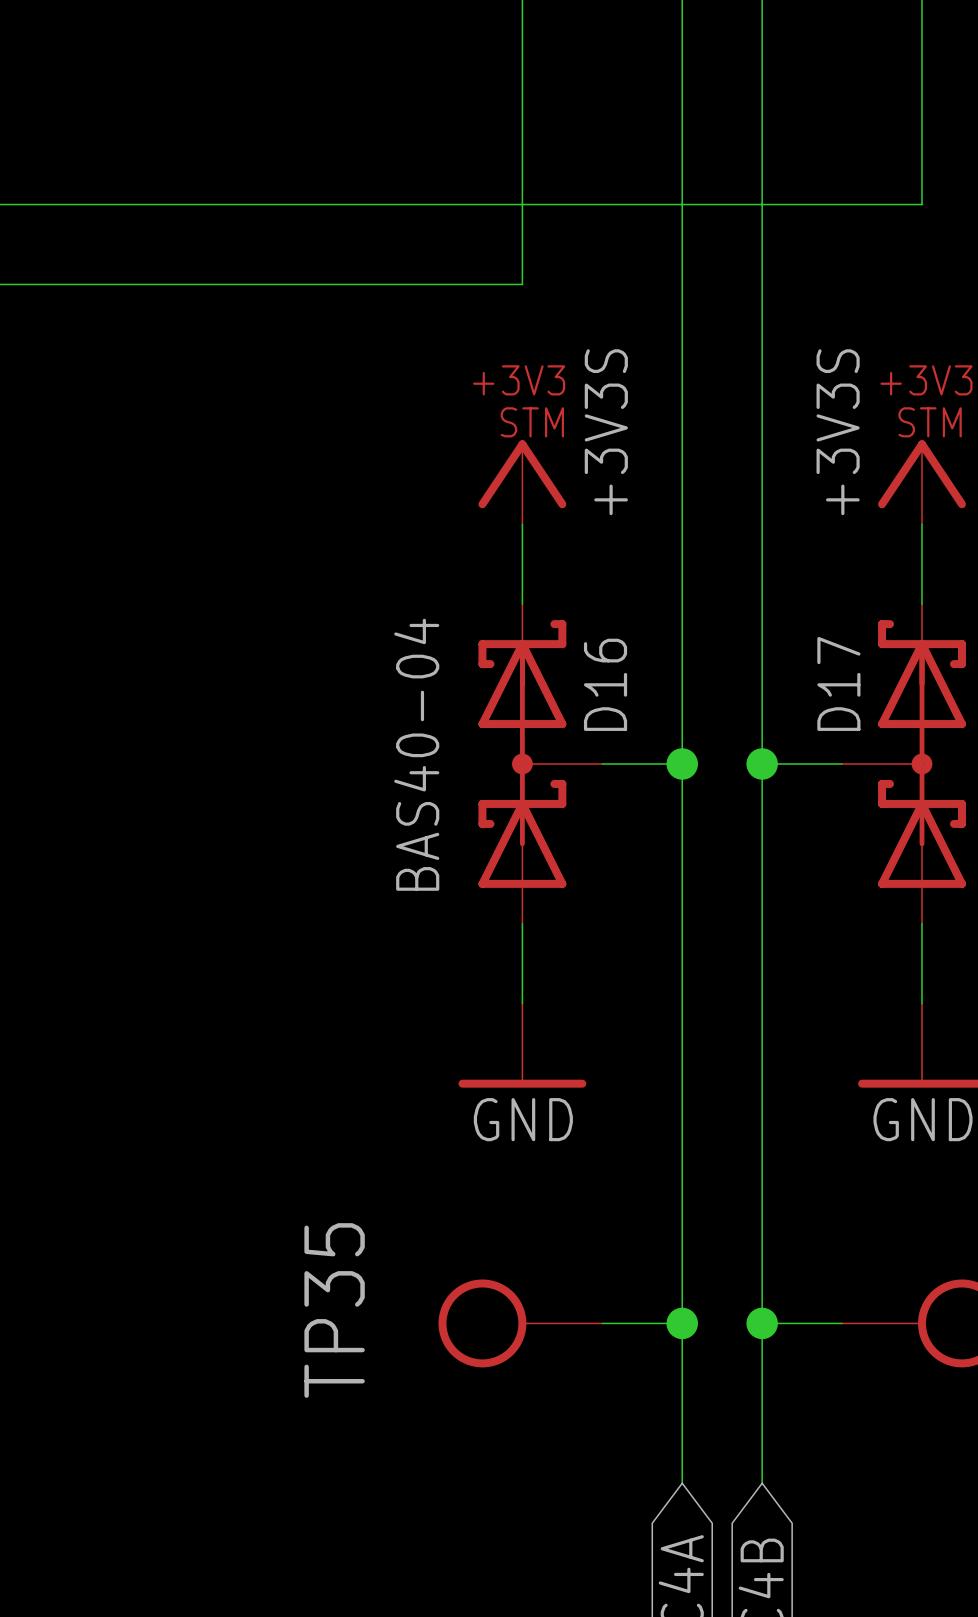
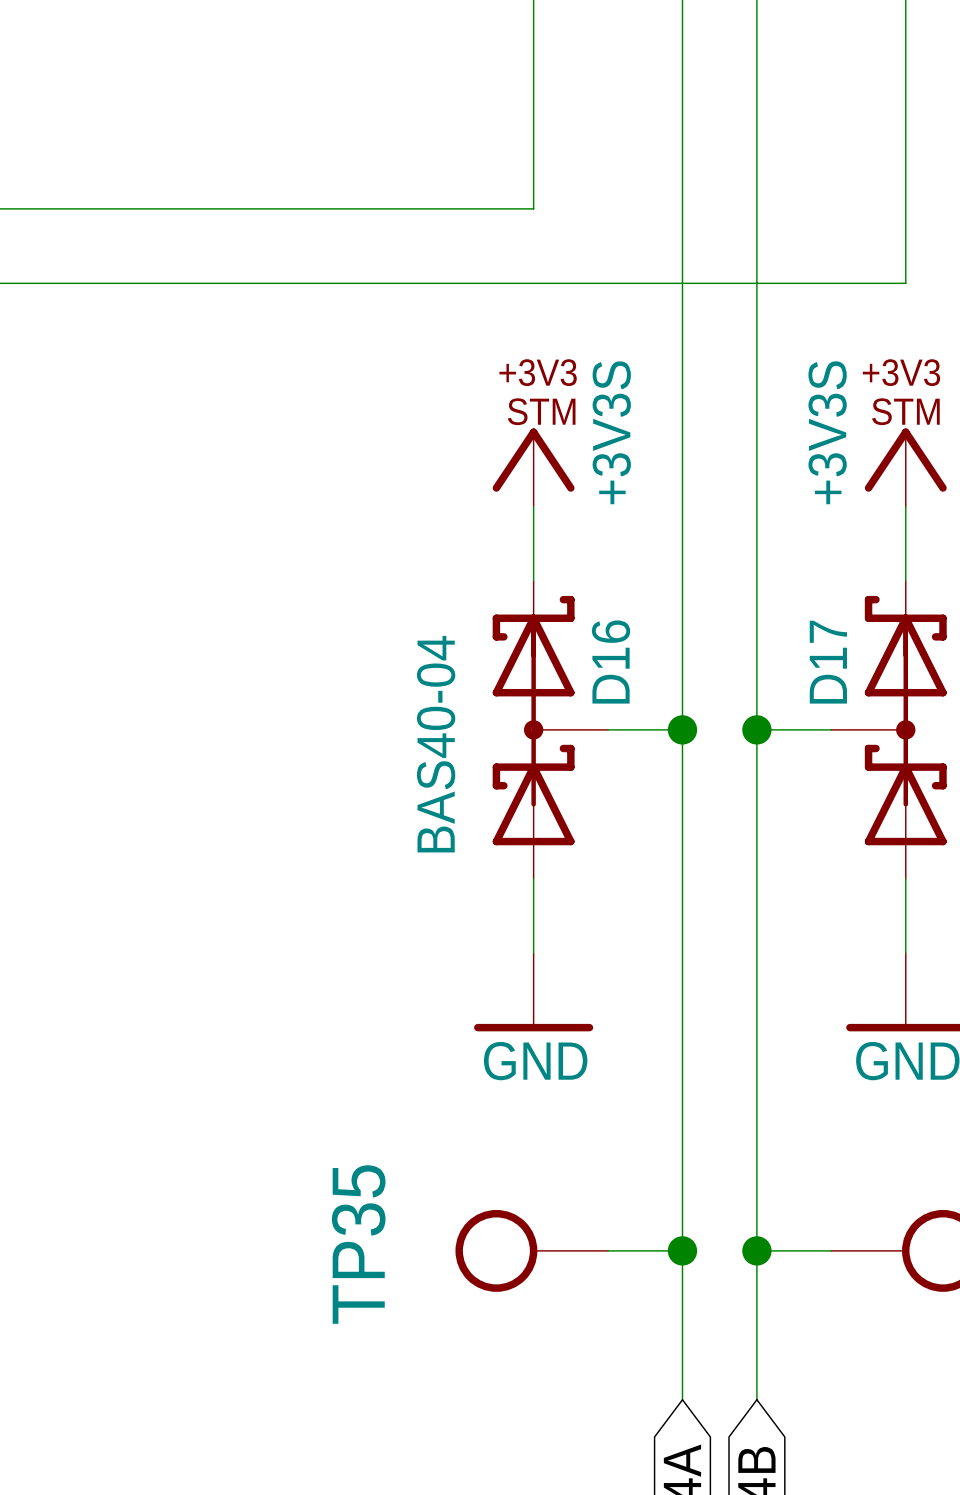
wire: (922, 204) (522, 204) (522, 284) -> (905, 208) (905, 283) (533, 283)

